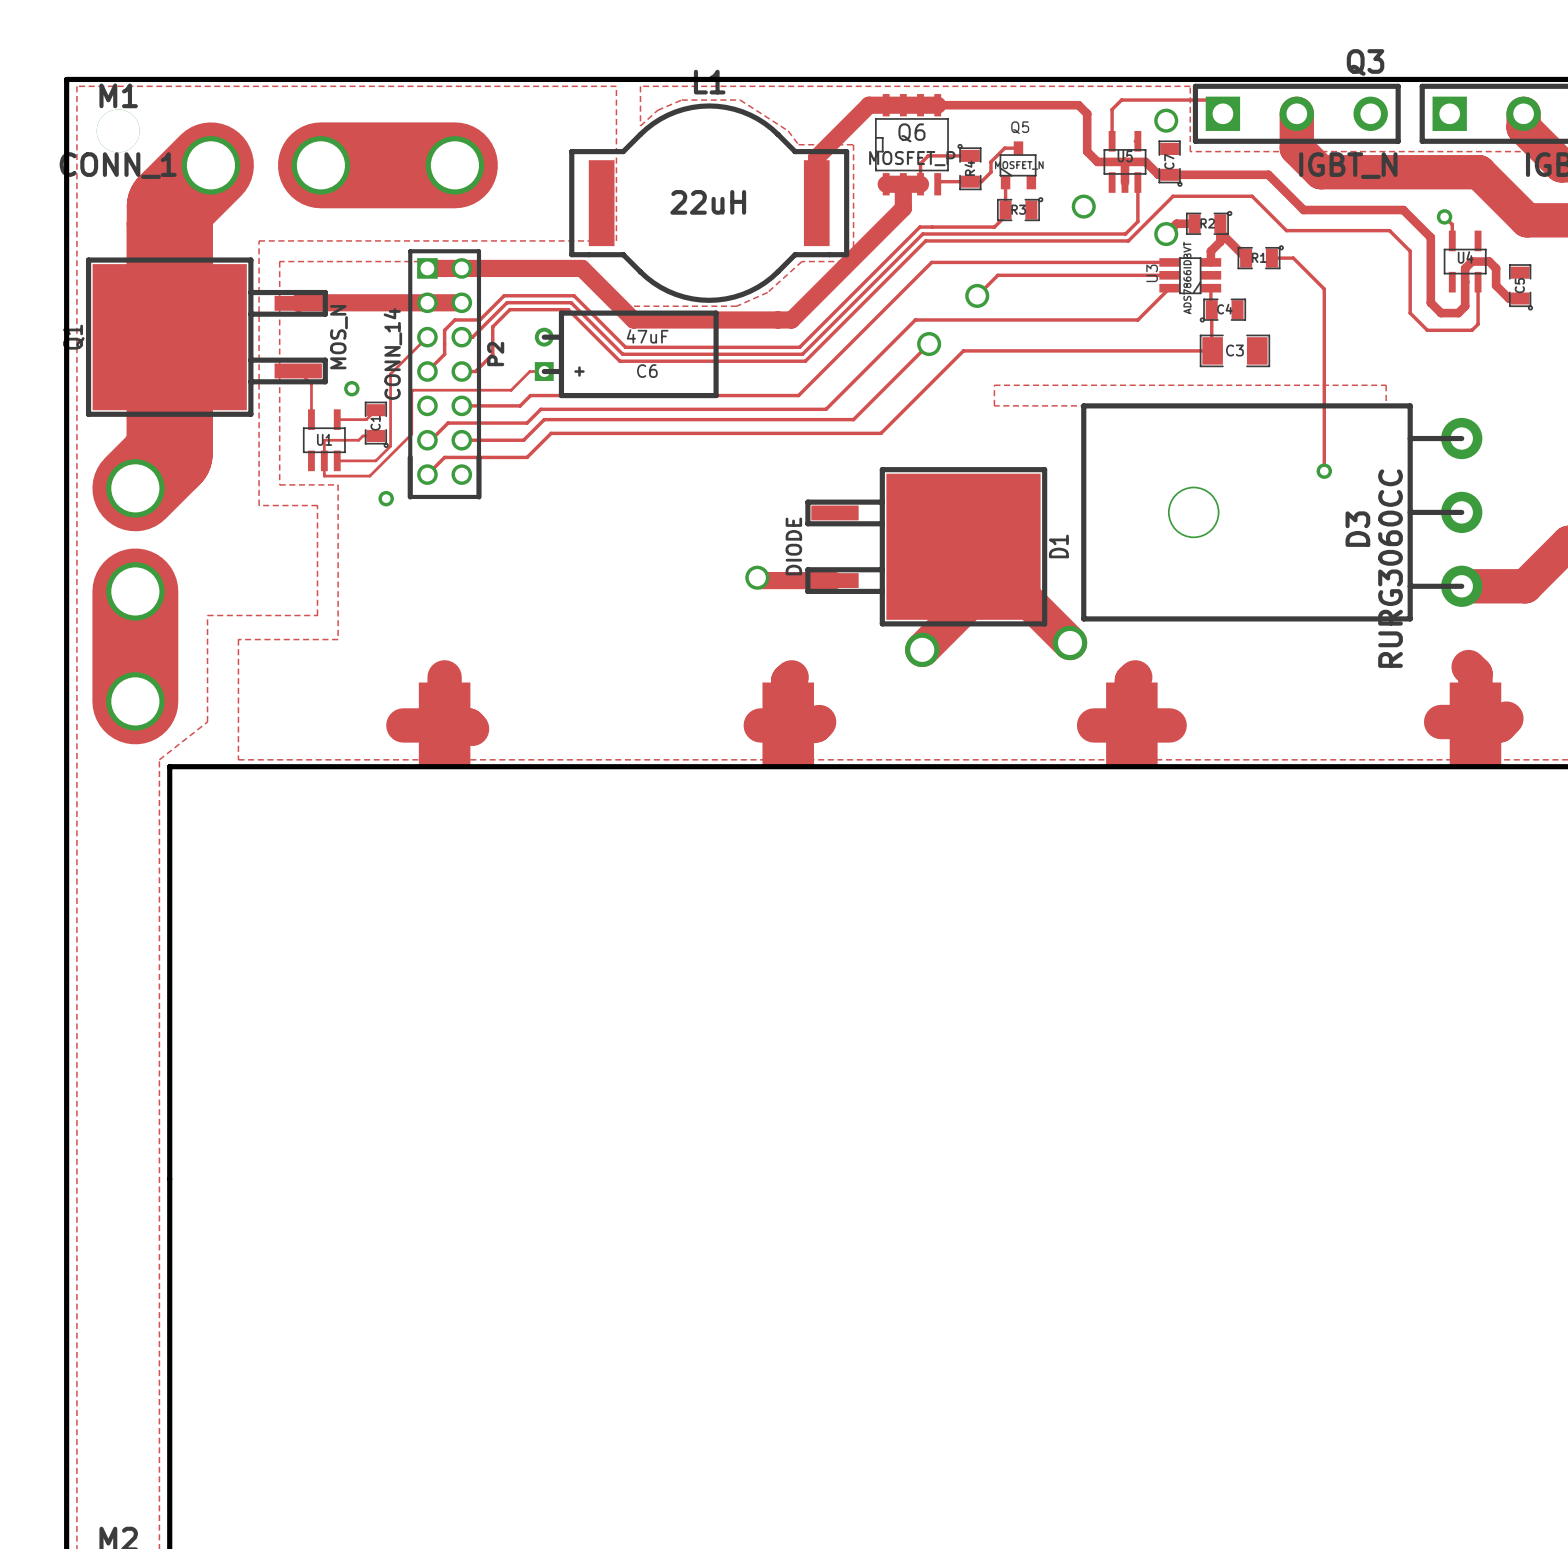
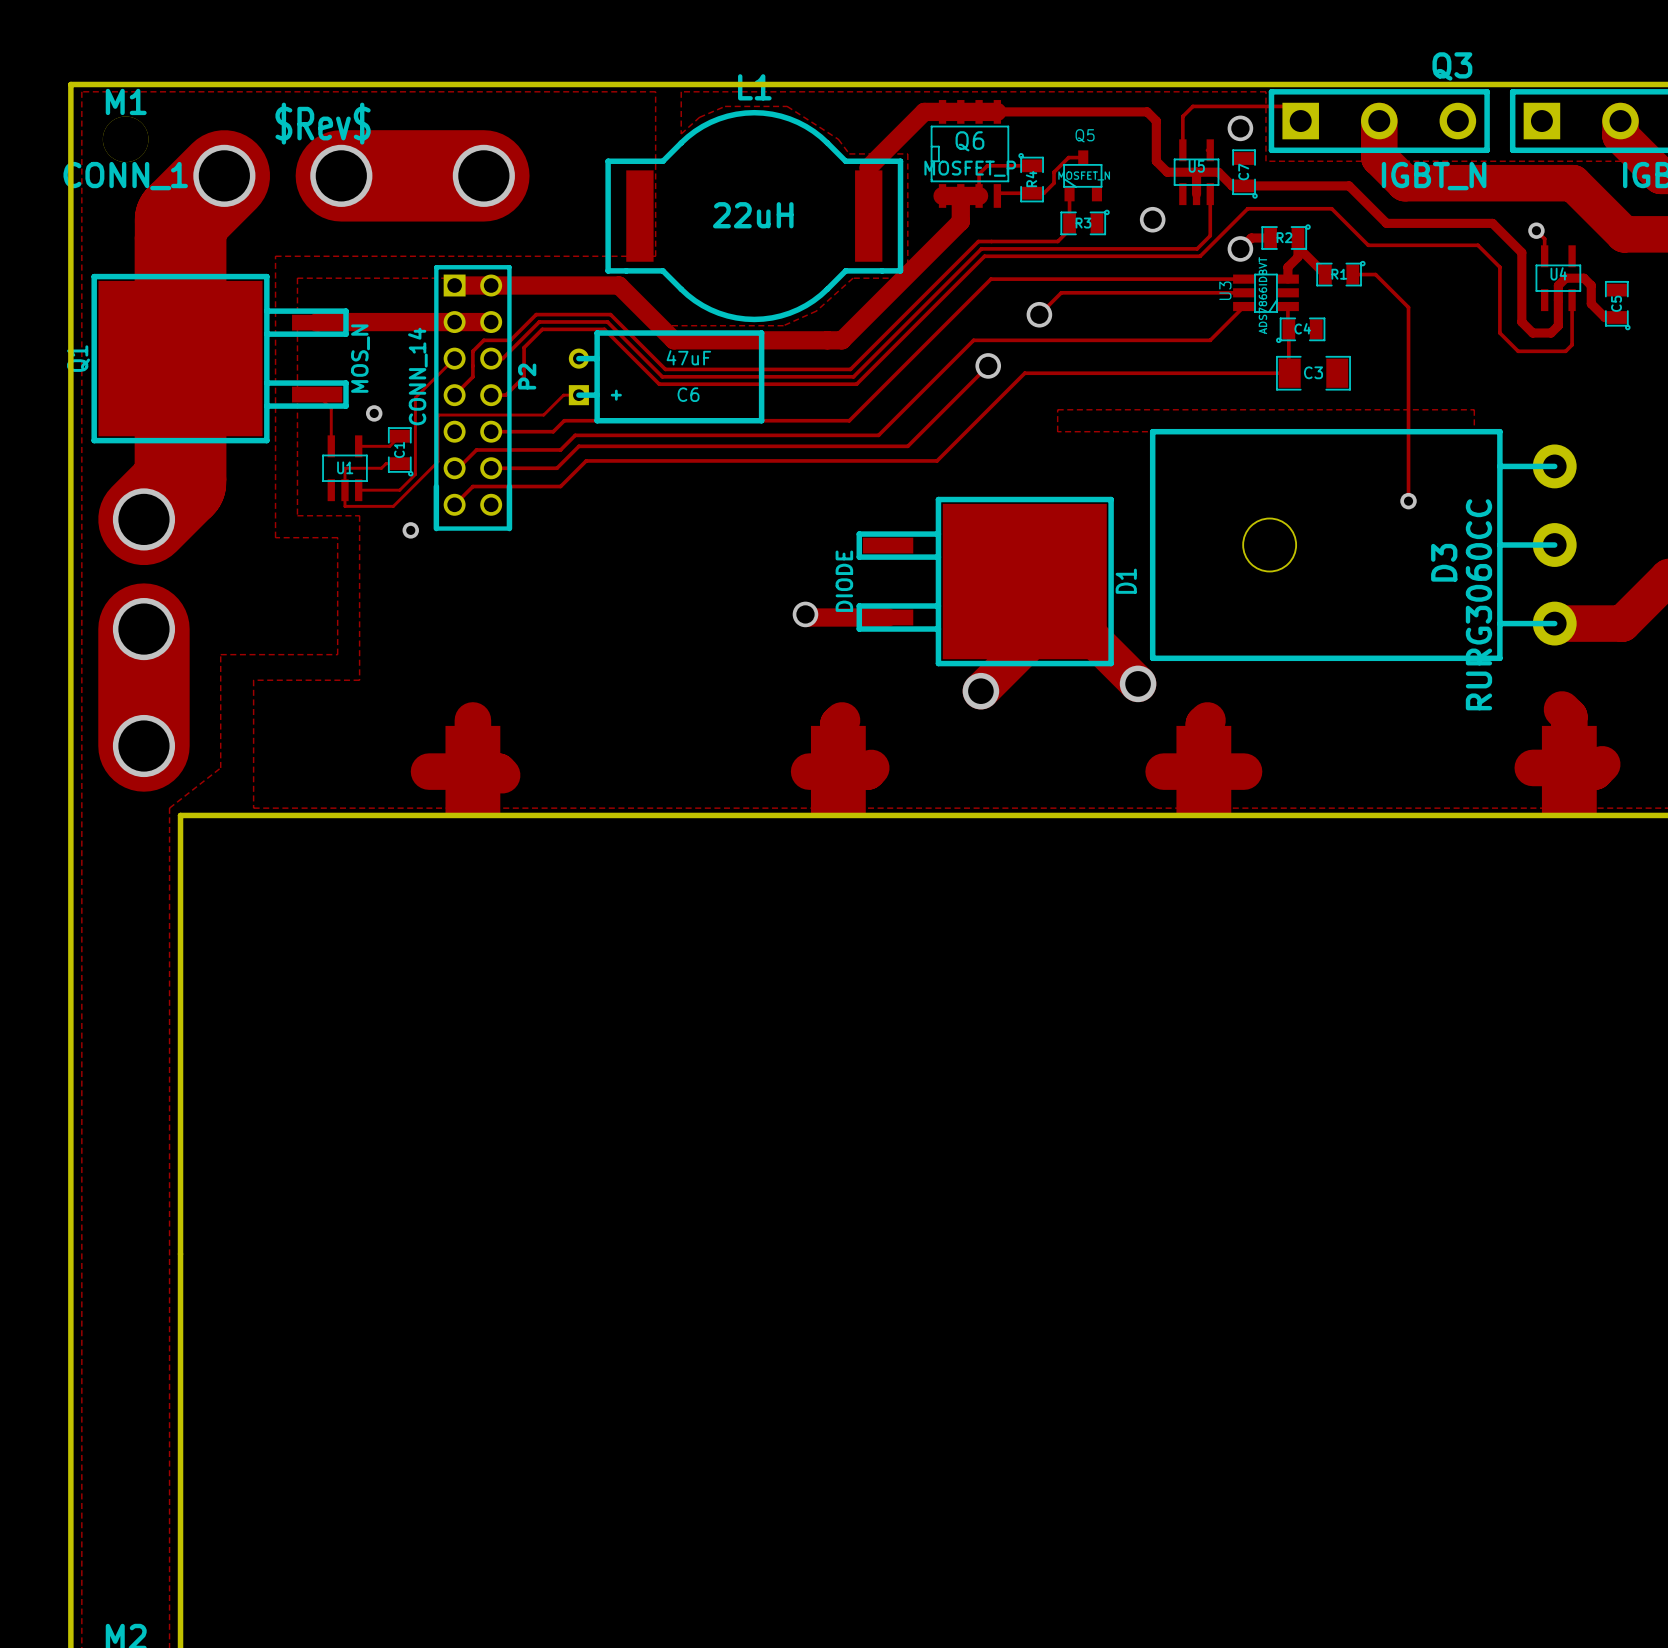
text: none -> $Rev$ (323, 123)

